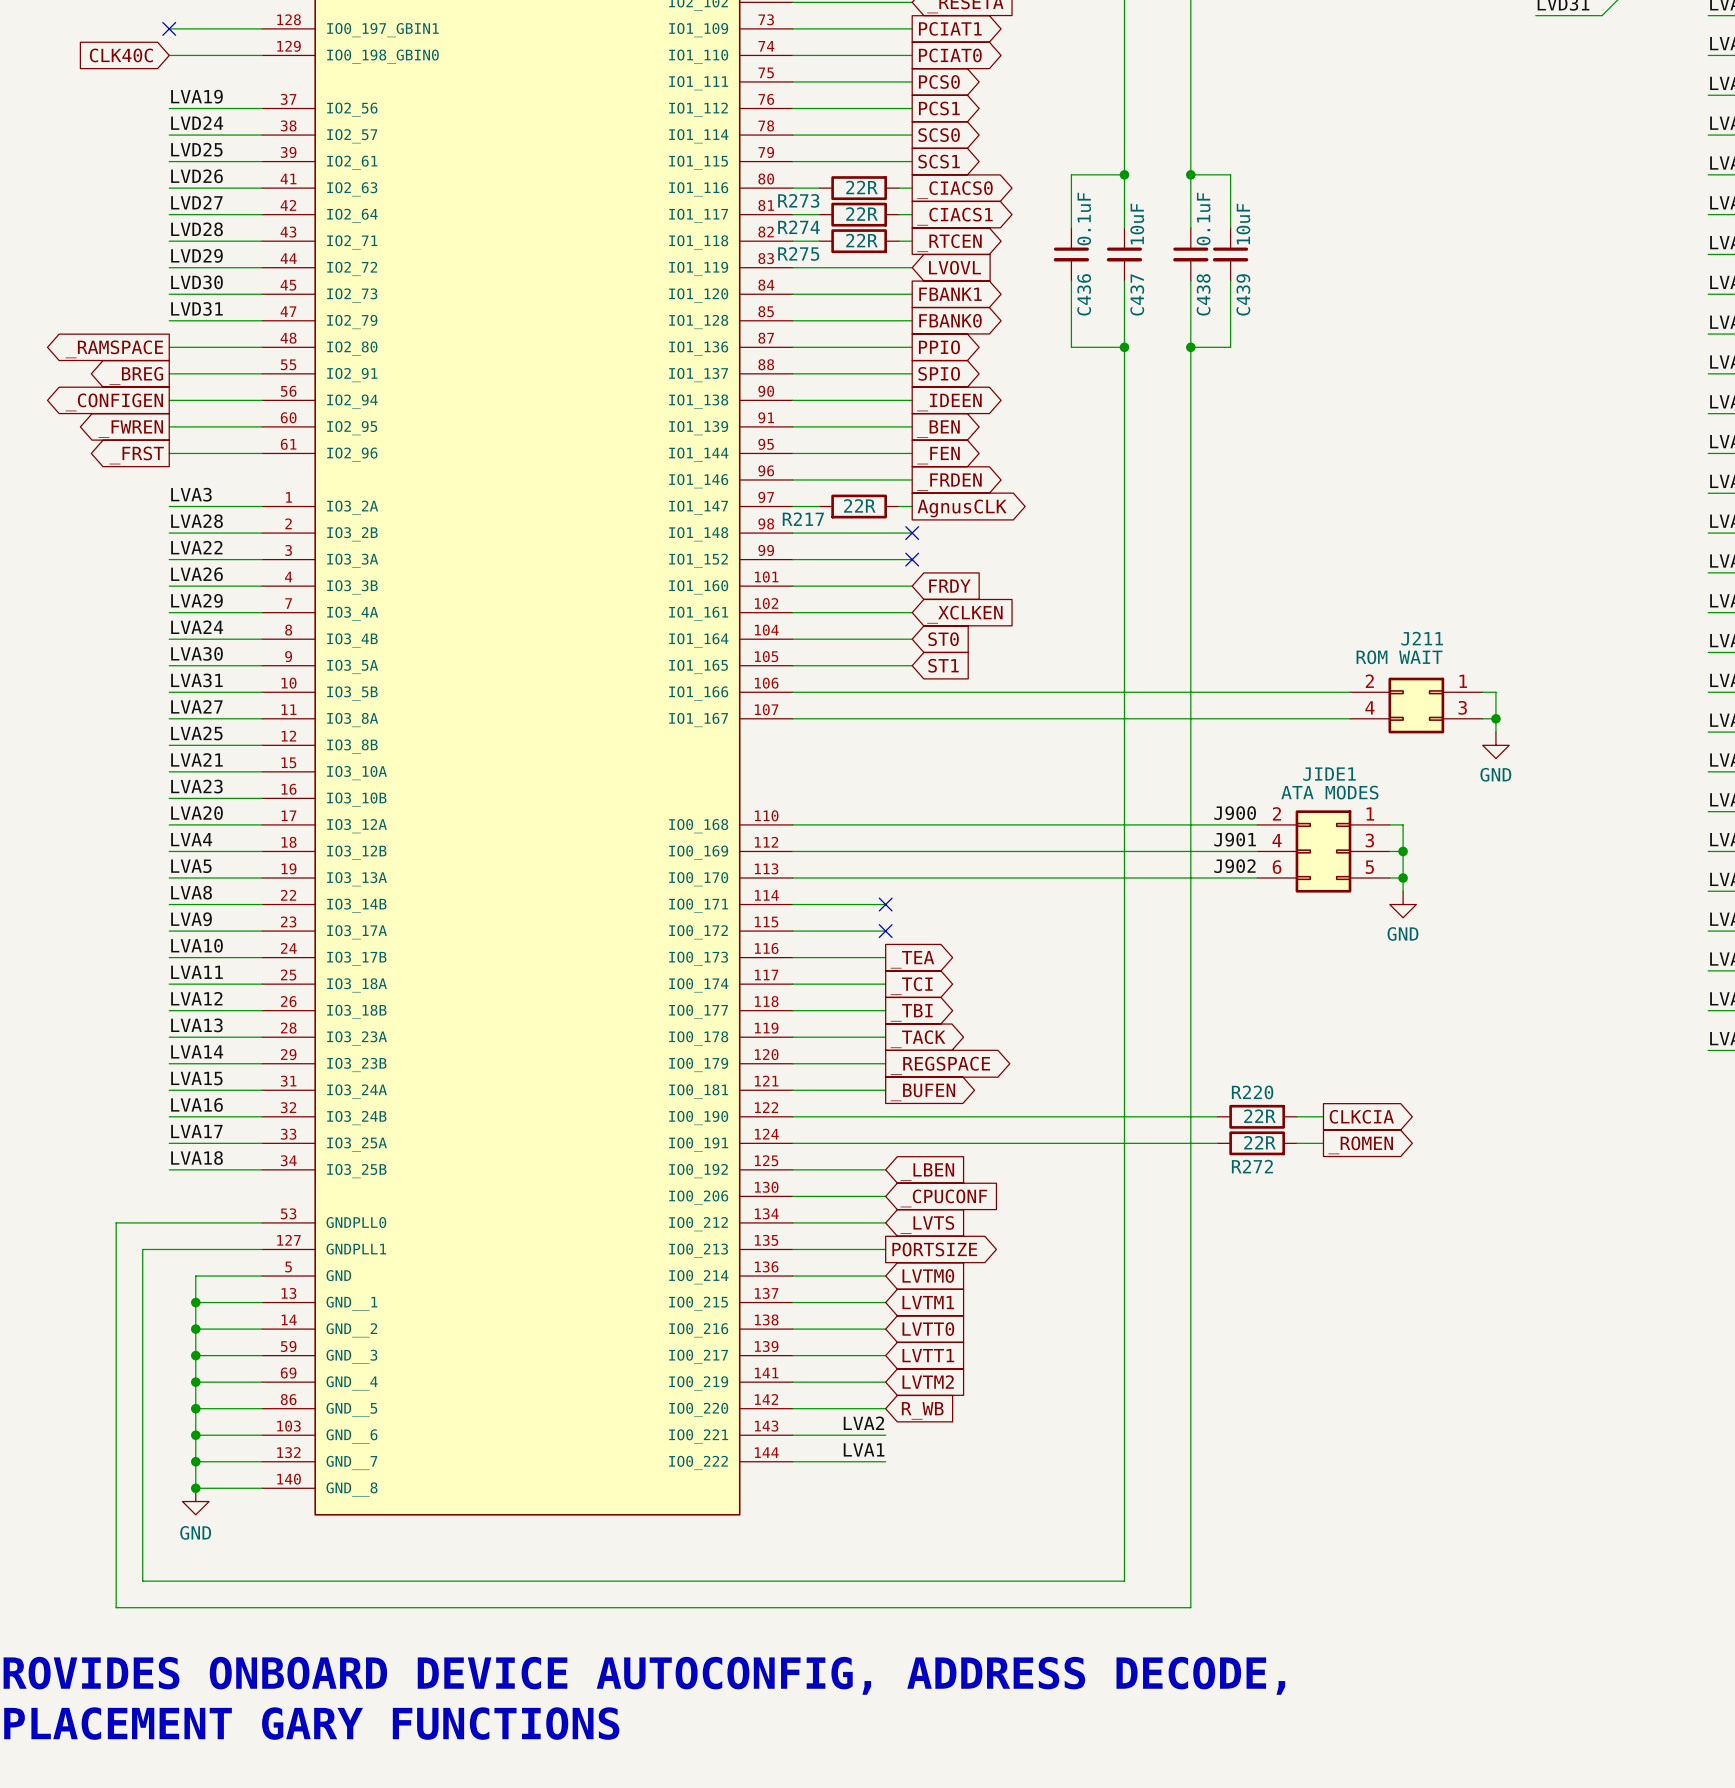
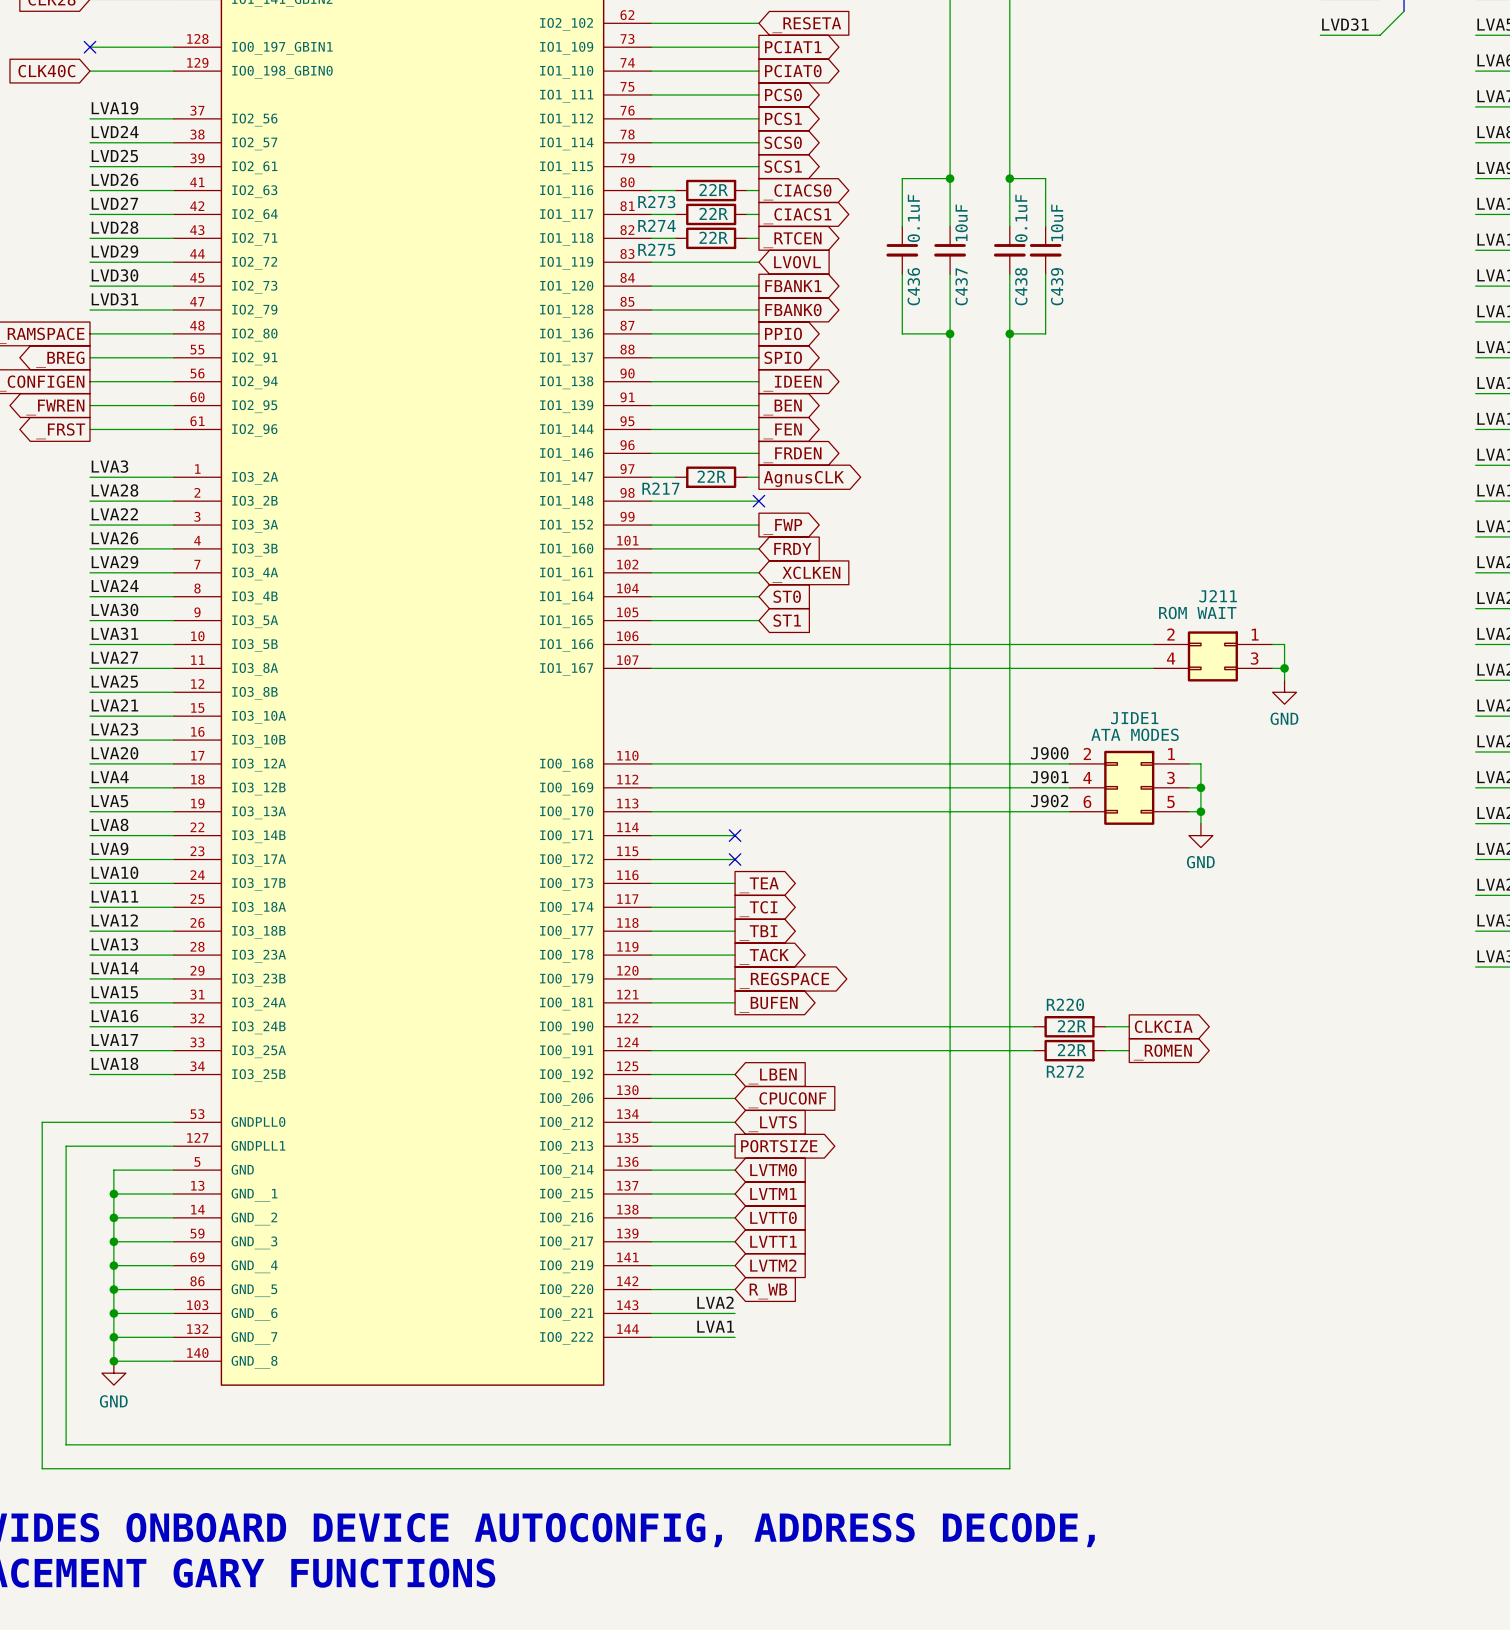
no-connect mark: (912, 559) -> none
global label: none -> _FWP (782, 526)

